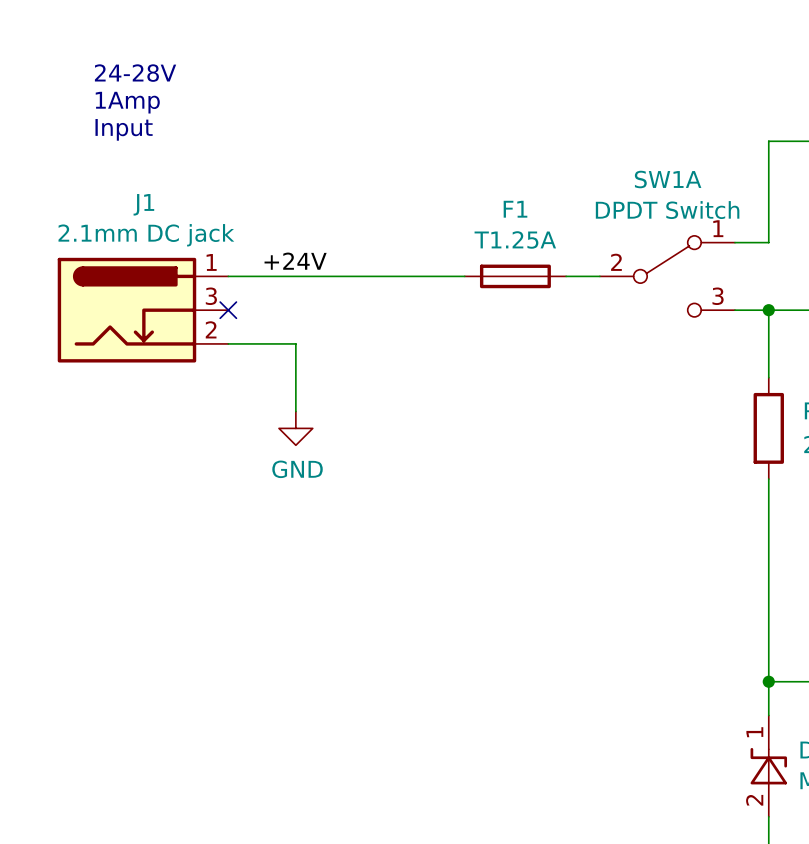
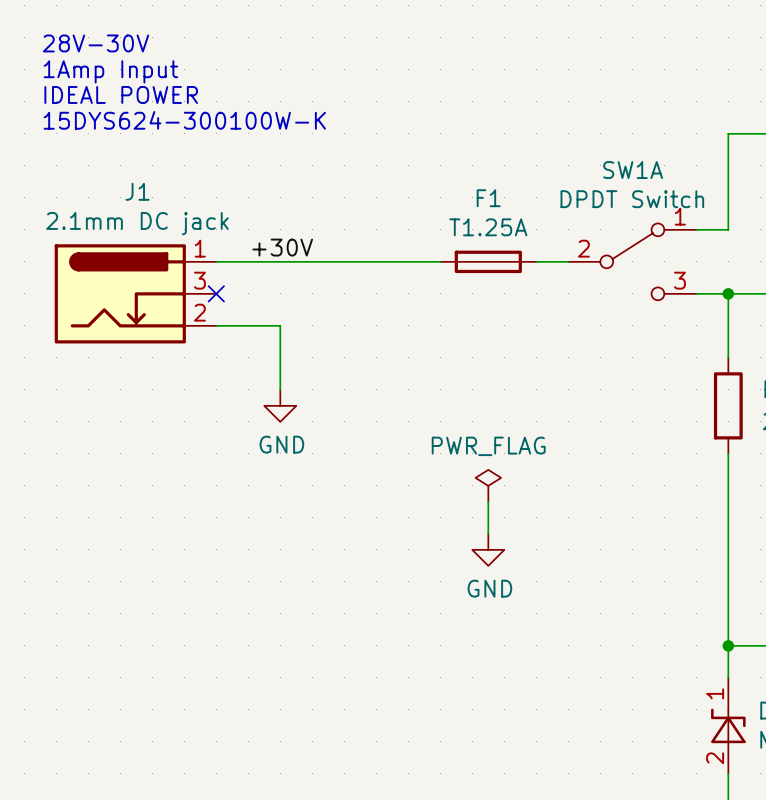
text: none -> 28V-30V (96, 43)
text: 24-28V (135, 73) -> none
text: none -> 1Amp Input (110, 71)
text: none -> IDEAL POWER (121, 94)
text: 1Amp (127, 102) -> none
text: none -> 15DYS624-300100W-K (184, 120)
text: Input (124, 129) -> none
label: +24V (295, 261) -> +30V (282, 247)
power symbol: none -> PWR_FLAG (488, 485)
wire: none -> (488, 501) (488, 533)
power symbol: none -> GND (488, 549)

